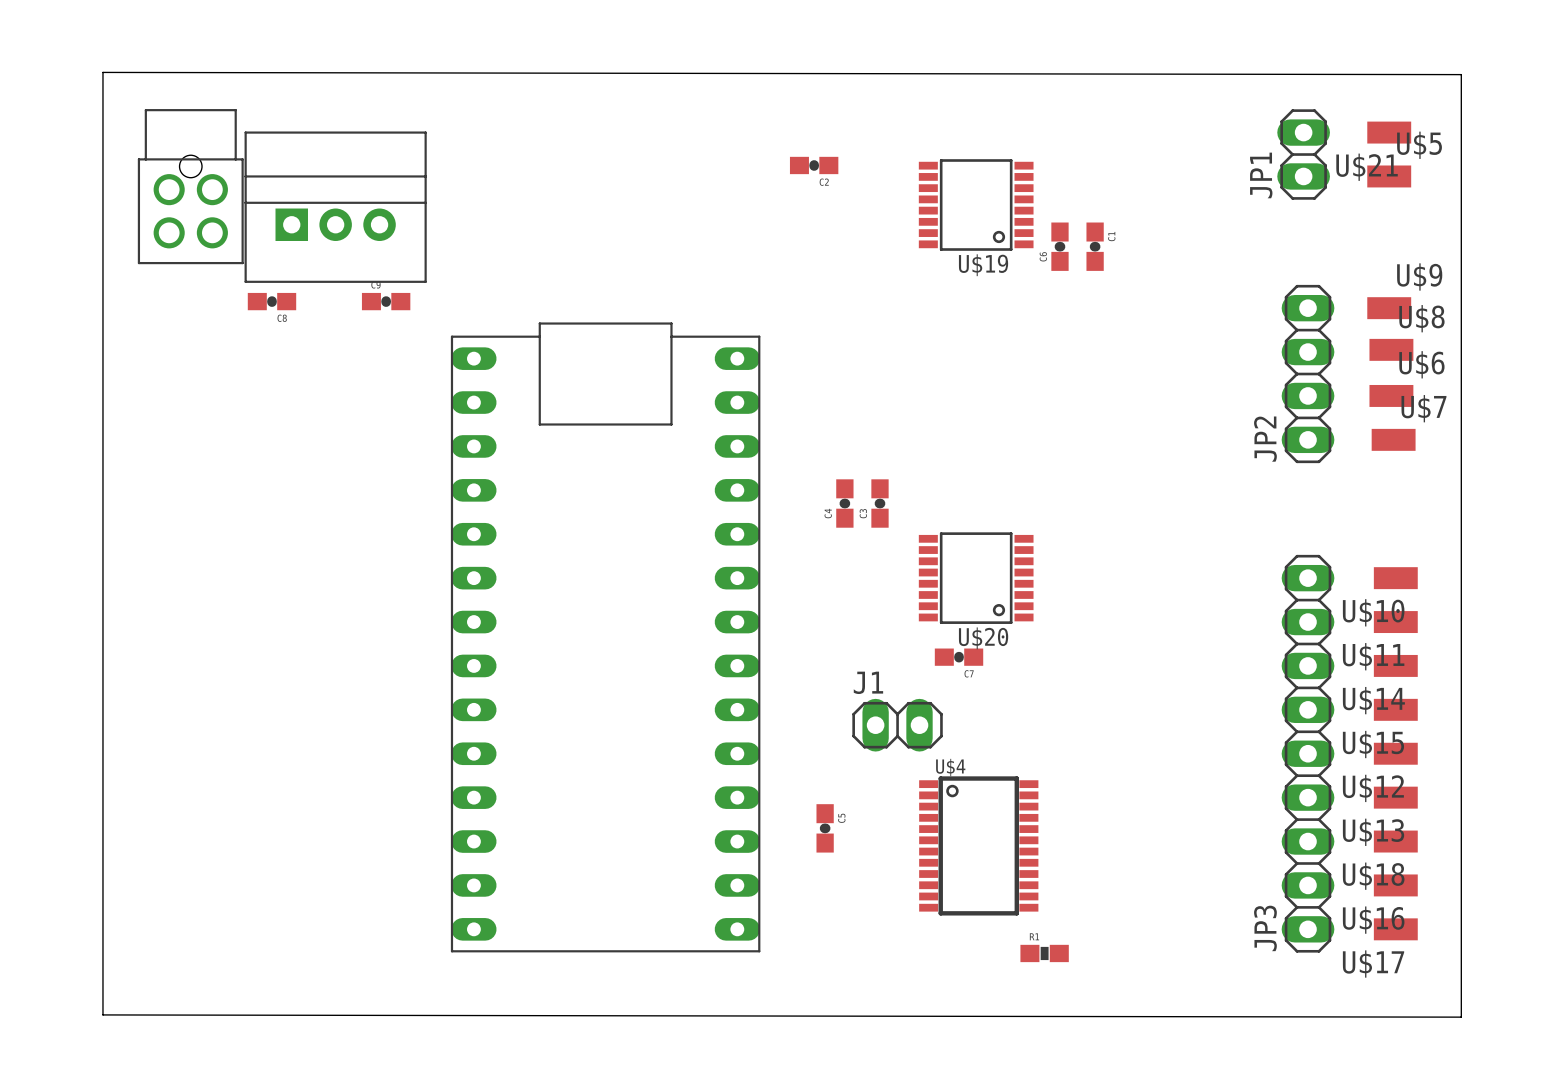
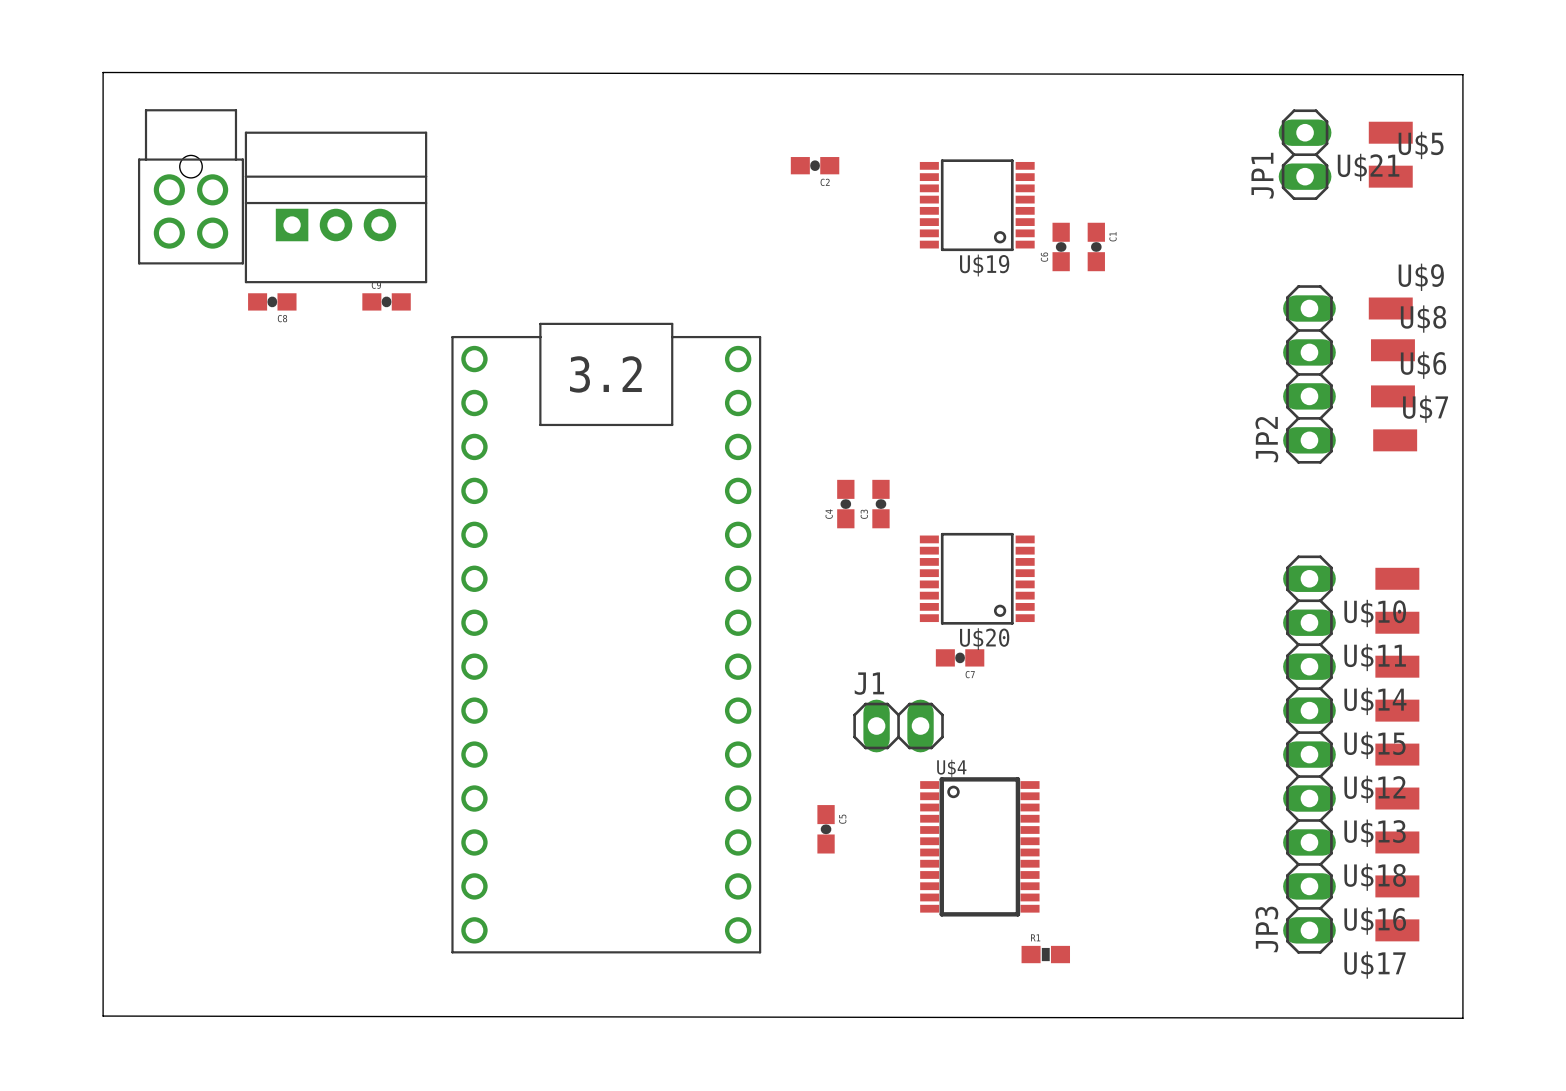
part footprint: [450, 322, 761, 953] -> [451, 322, 762, 954]

